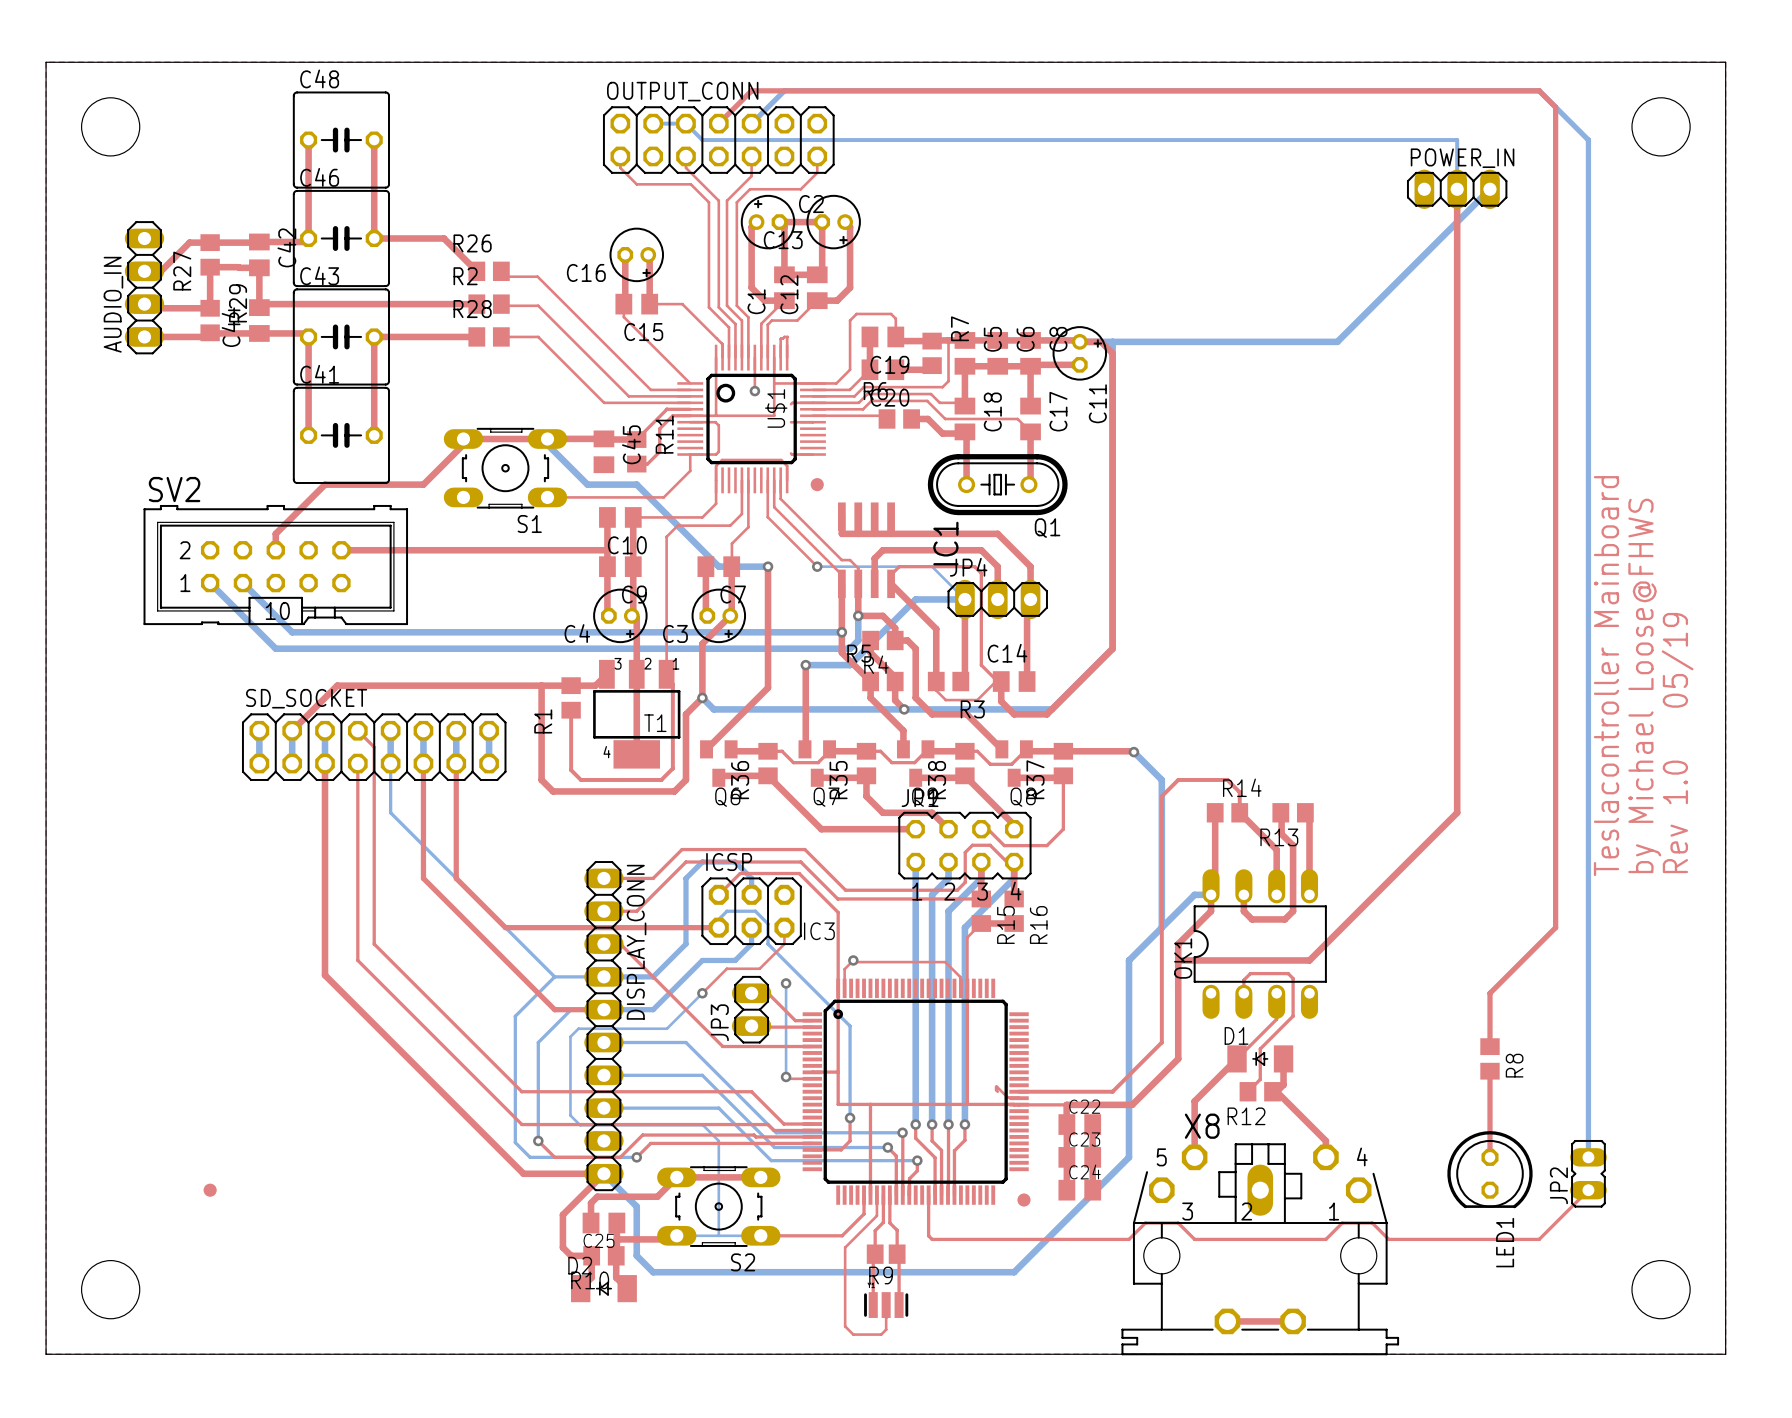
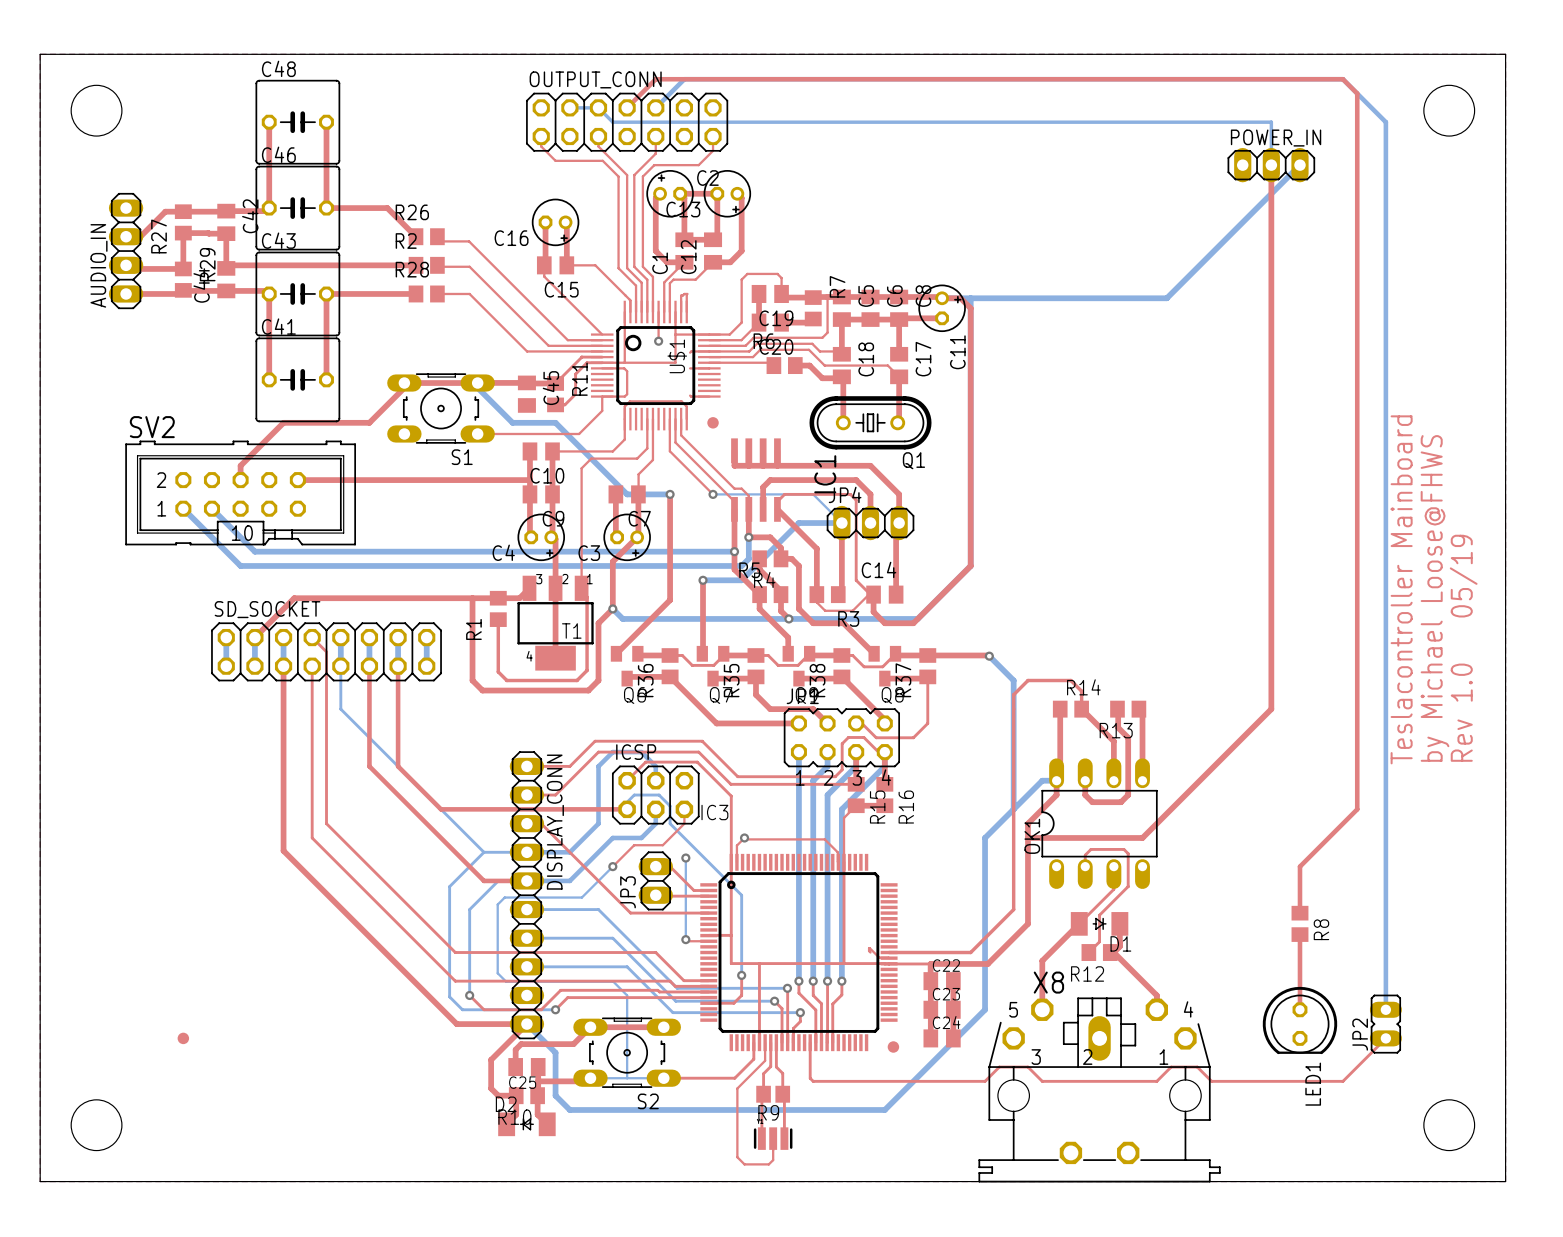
D1 name position: D1 (1236, 1035) -> D1 (1120, 943)
top track: (1227, 1321) (1293, 1321) -> none

